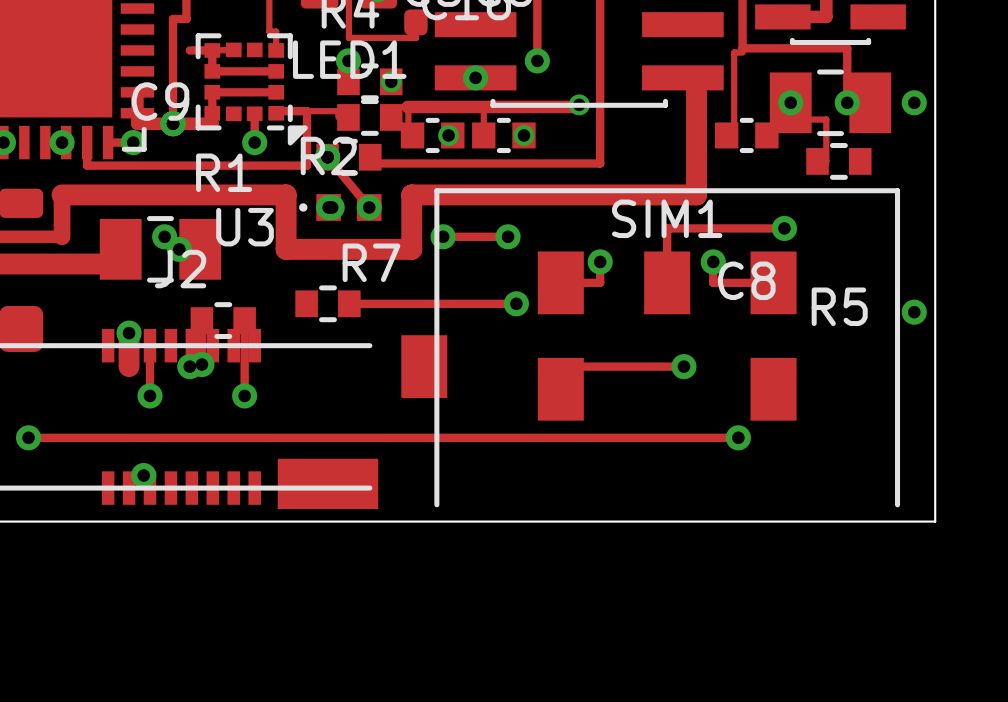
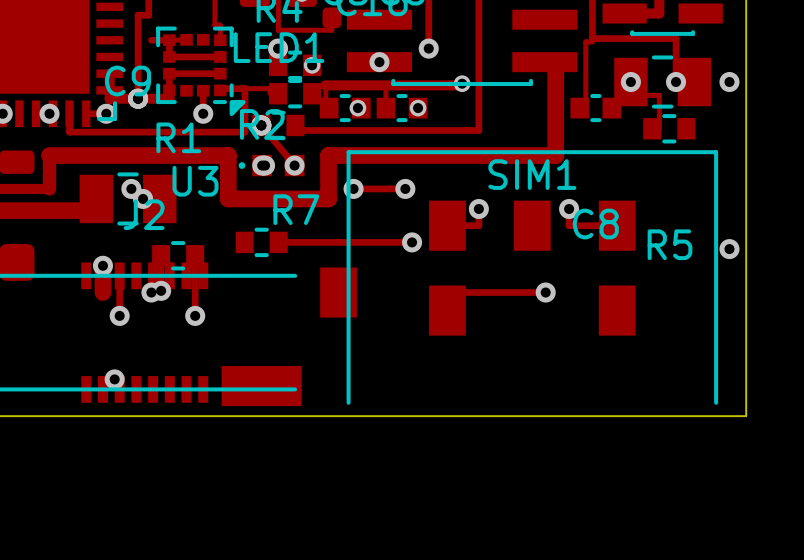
track: (784, 228) (667, 228) (667, 282) -> none
via: (784, 228) -> none
track: (28, 437) (738, 437) -> none
via: (28, 437) -> none
via: (738, 437) -> none

